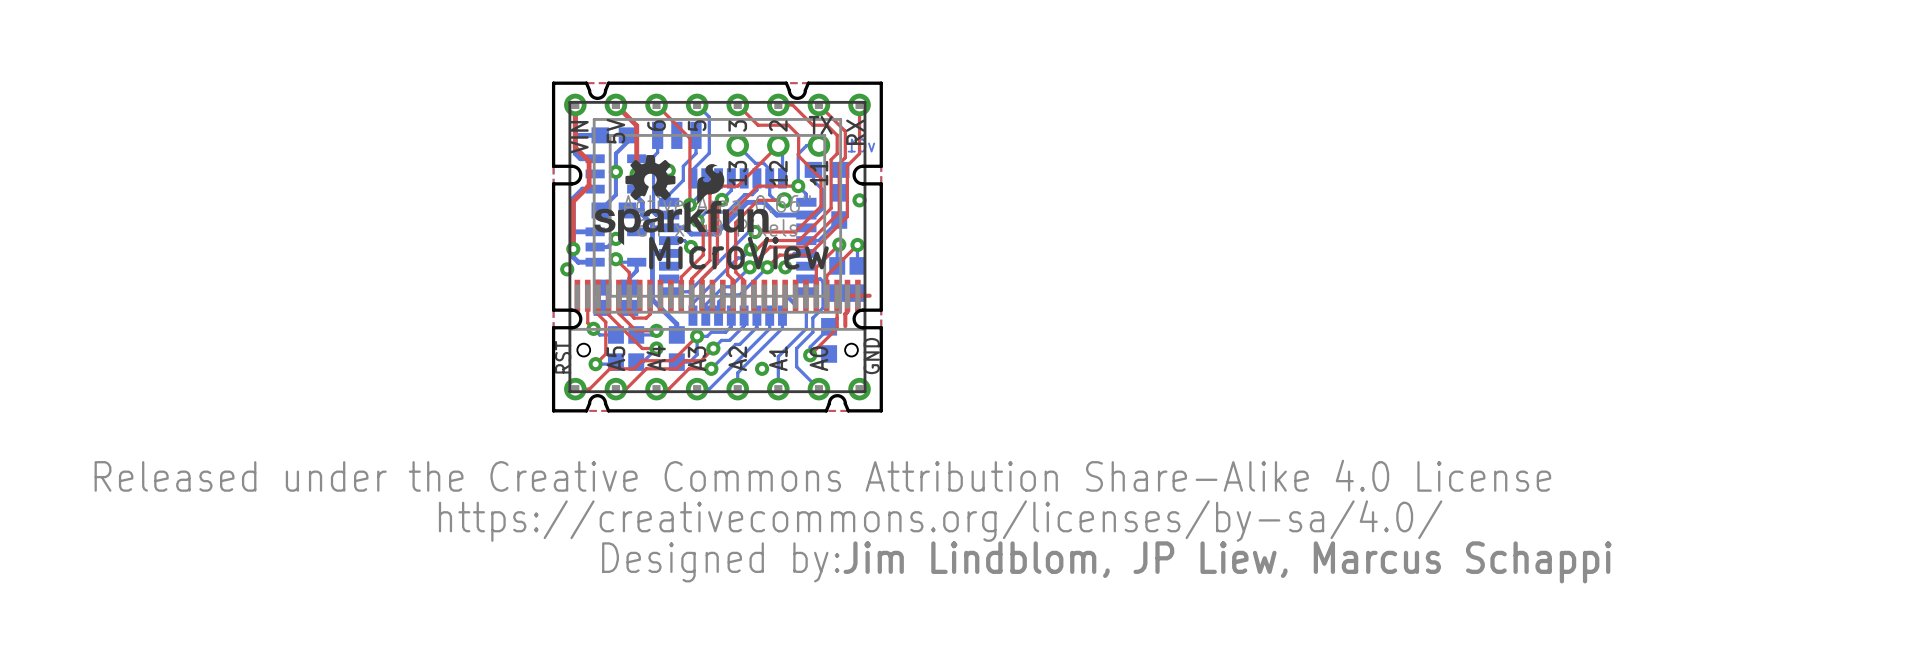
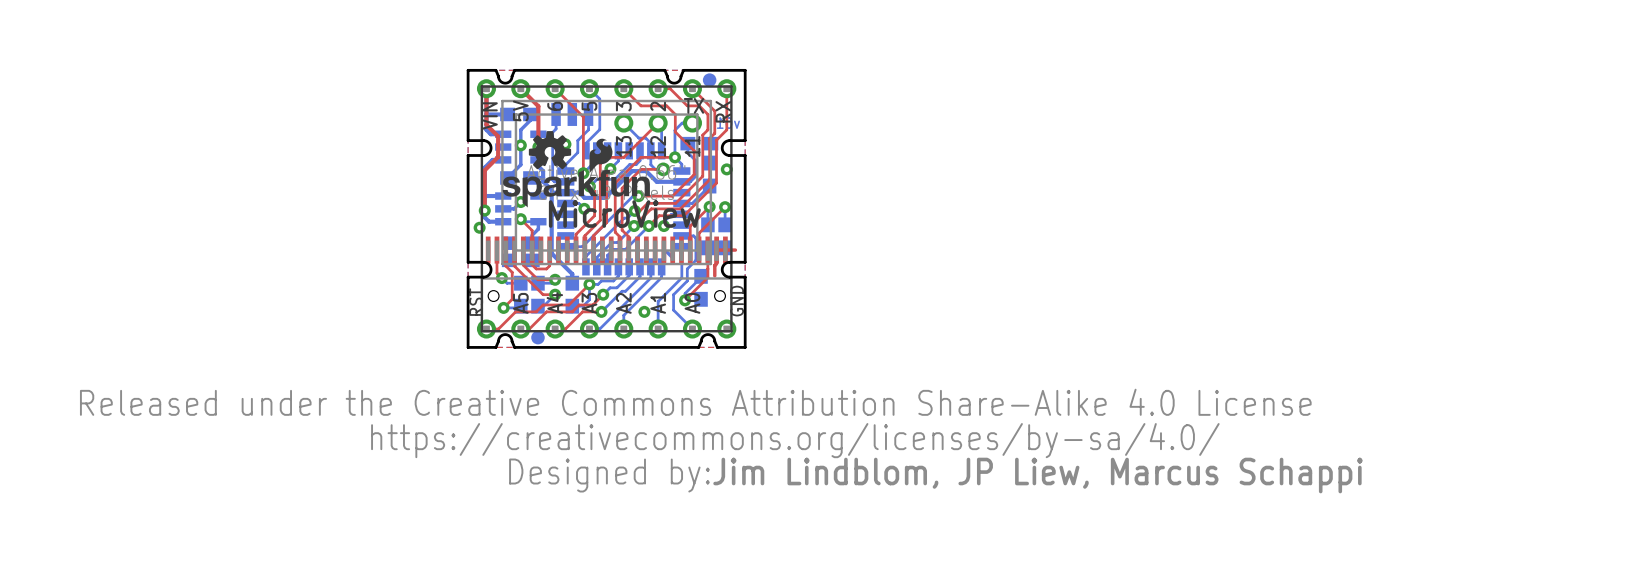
part: none -> (709, 80)
part: none -> (537, 337)

